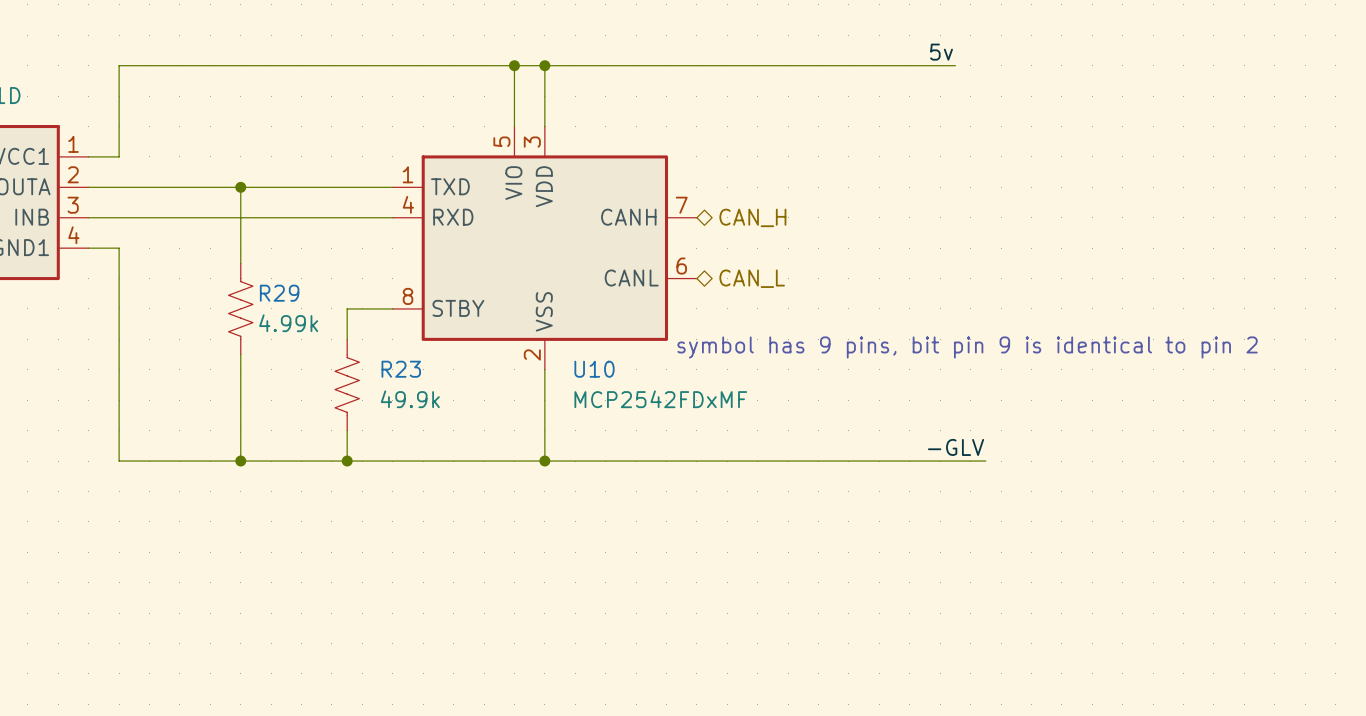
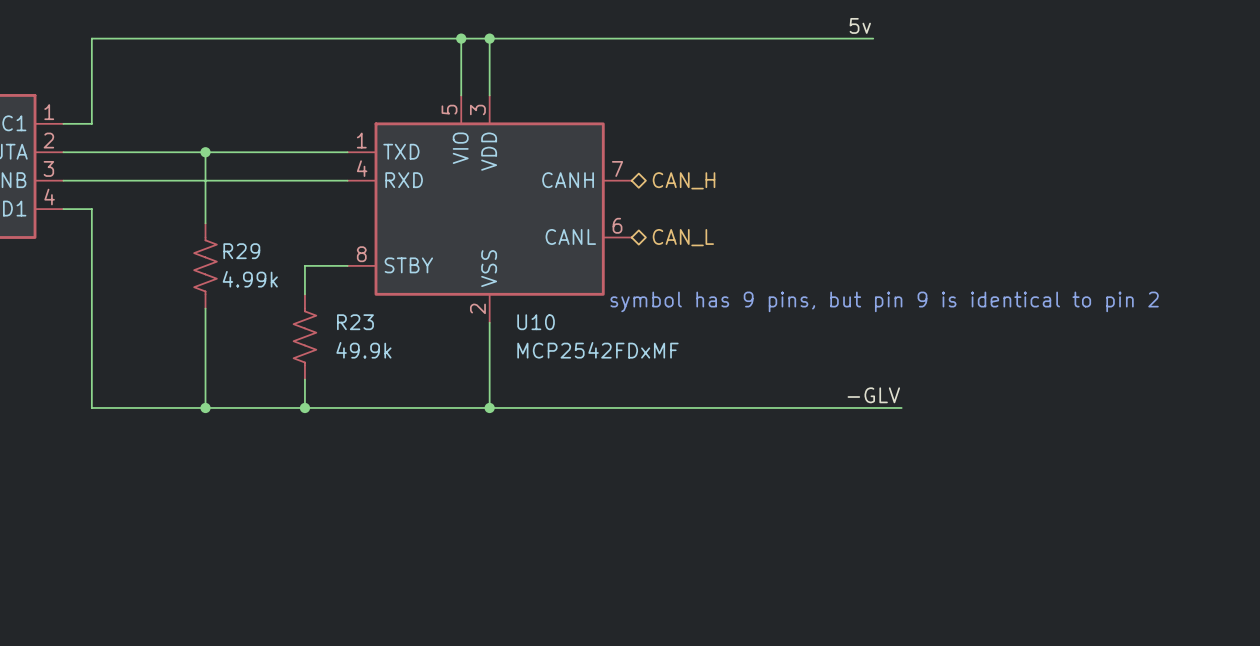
text: symbol has 9 pins, bit pin 9 is identical to pin 2 (967, 347) -> symbol has 9 pins, but pin 9 is identical to pin 2 (884, 301)

